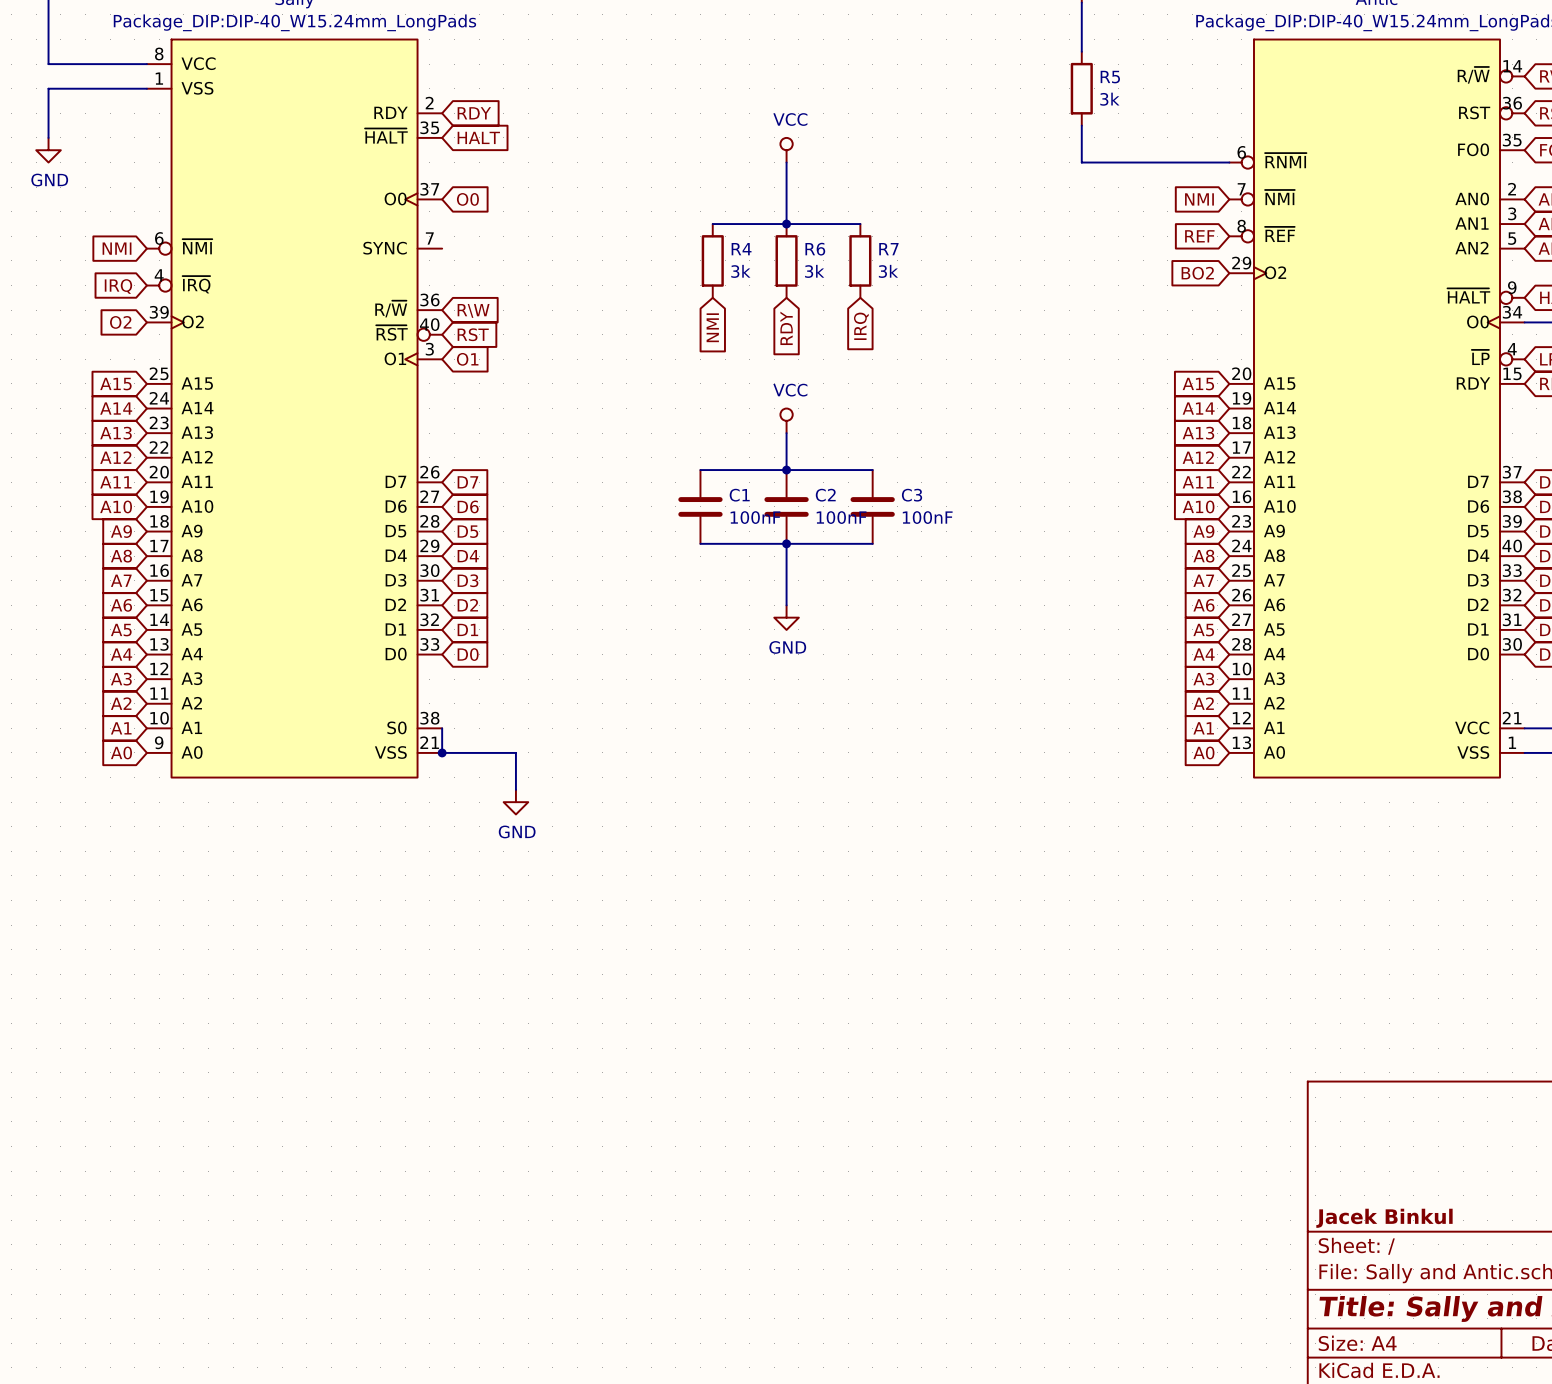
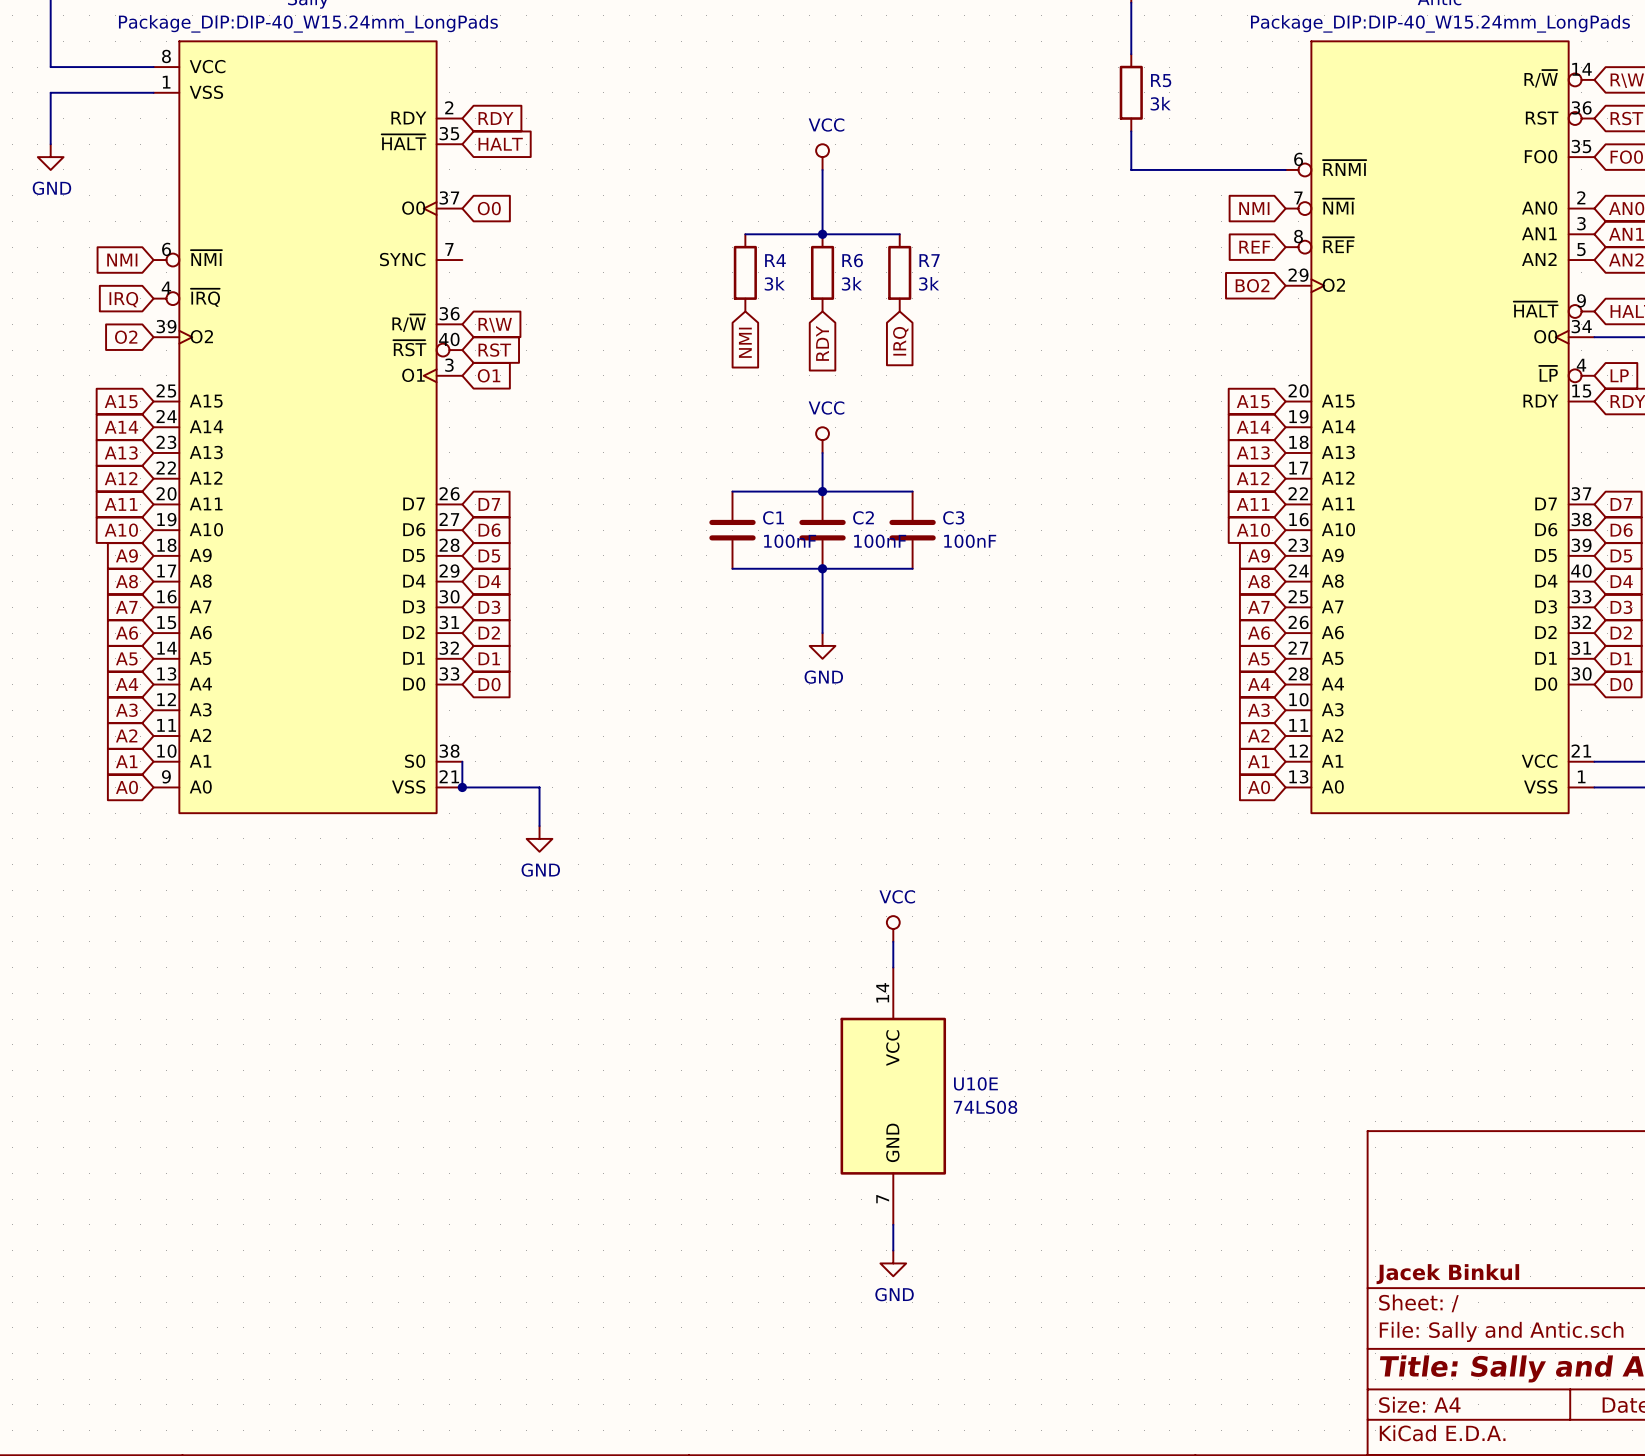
power symbol: none -> VCC (893, 928)
wire: none -> (893, 941) (893, 967)
U10E: none -> 74LS08 (893, 1096)
wire: none -> (893, 1224) (893, 1250)
power symbol: none -> GND (893, 1263)

